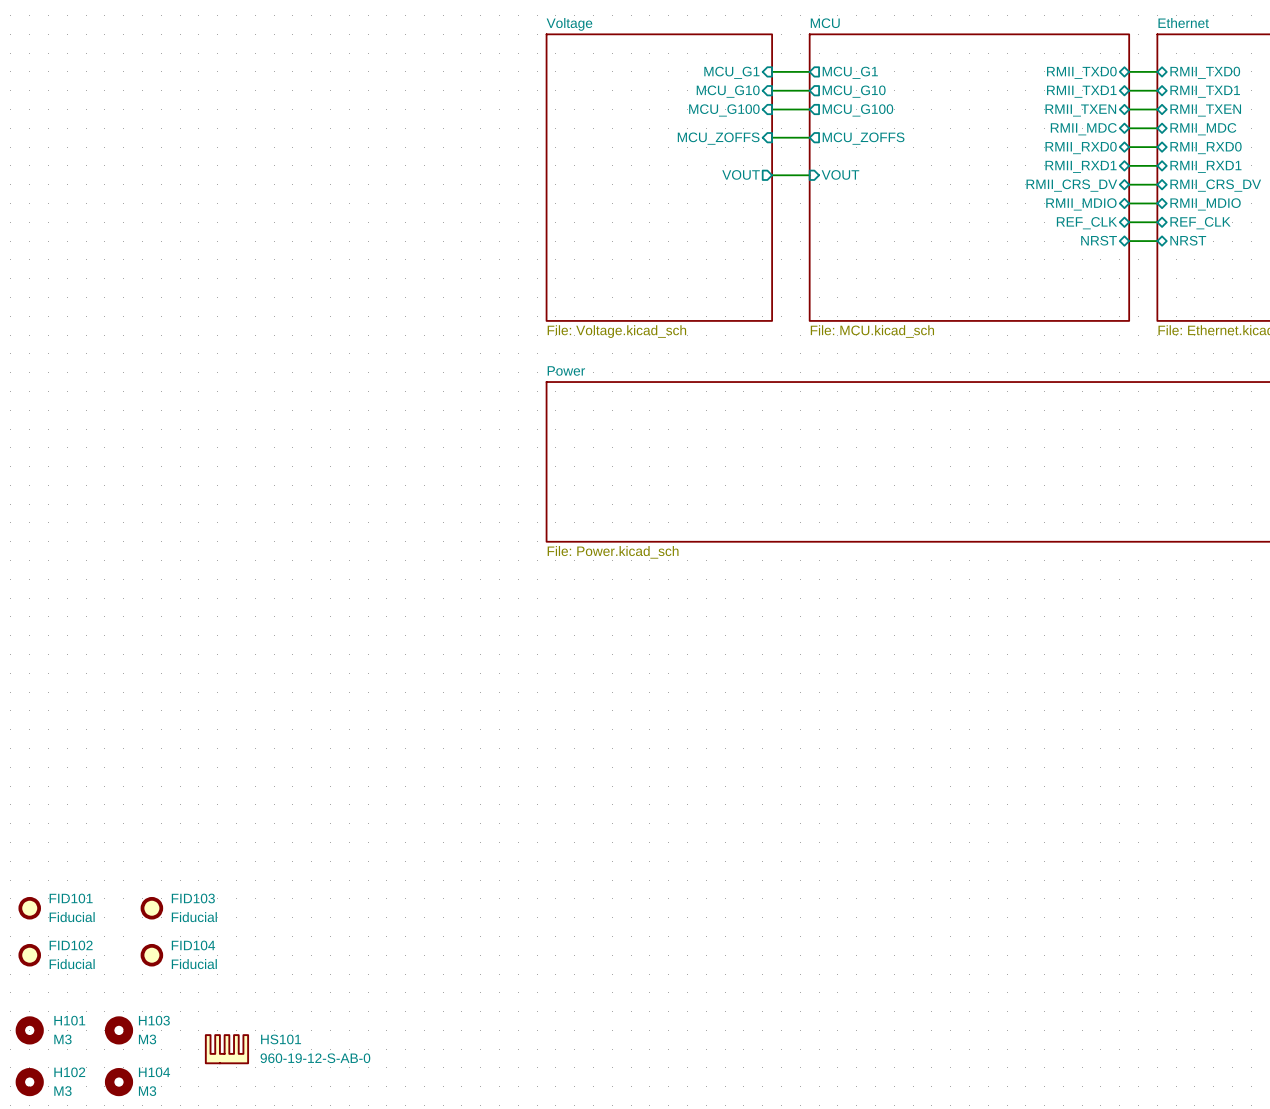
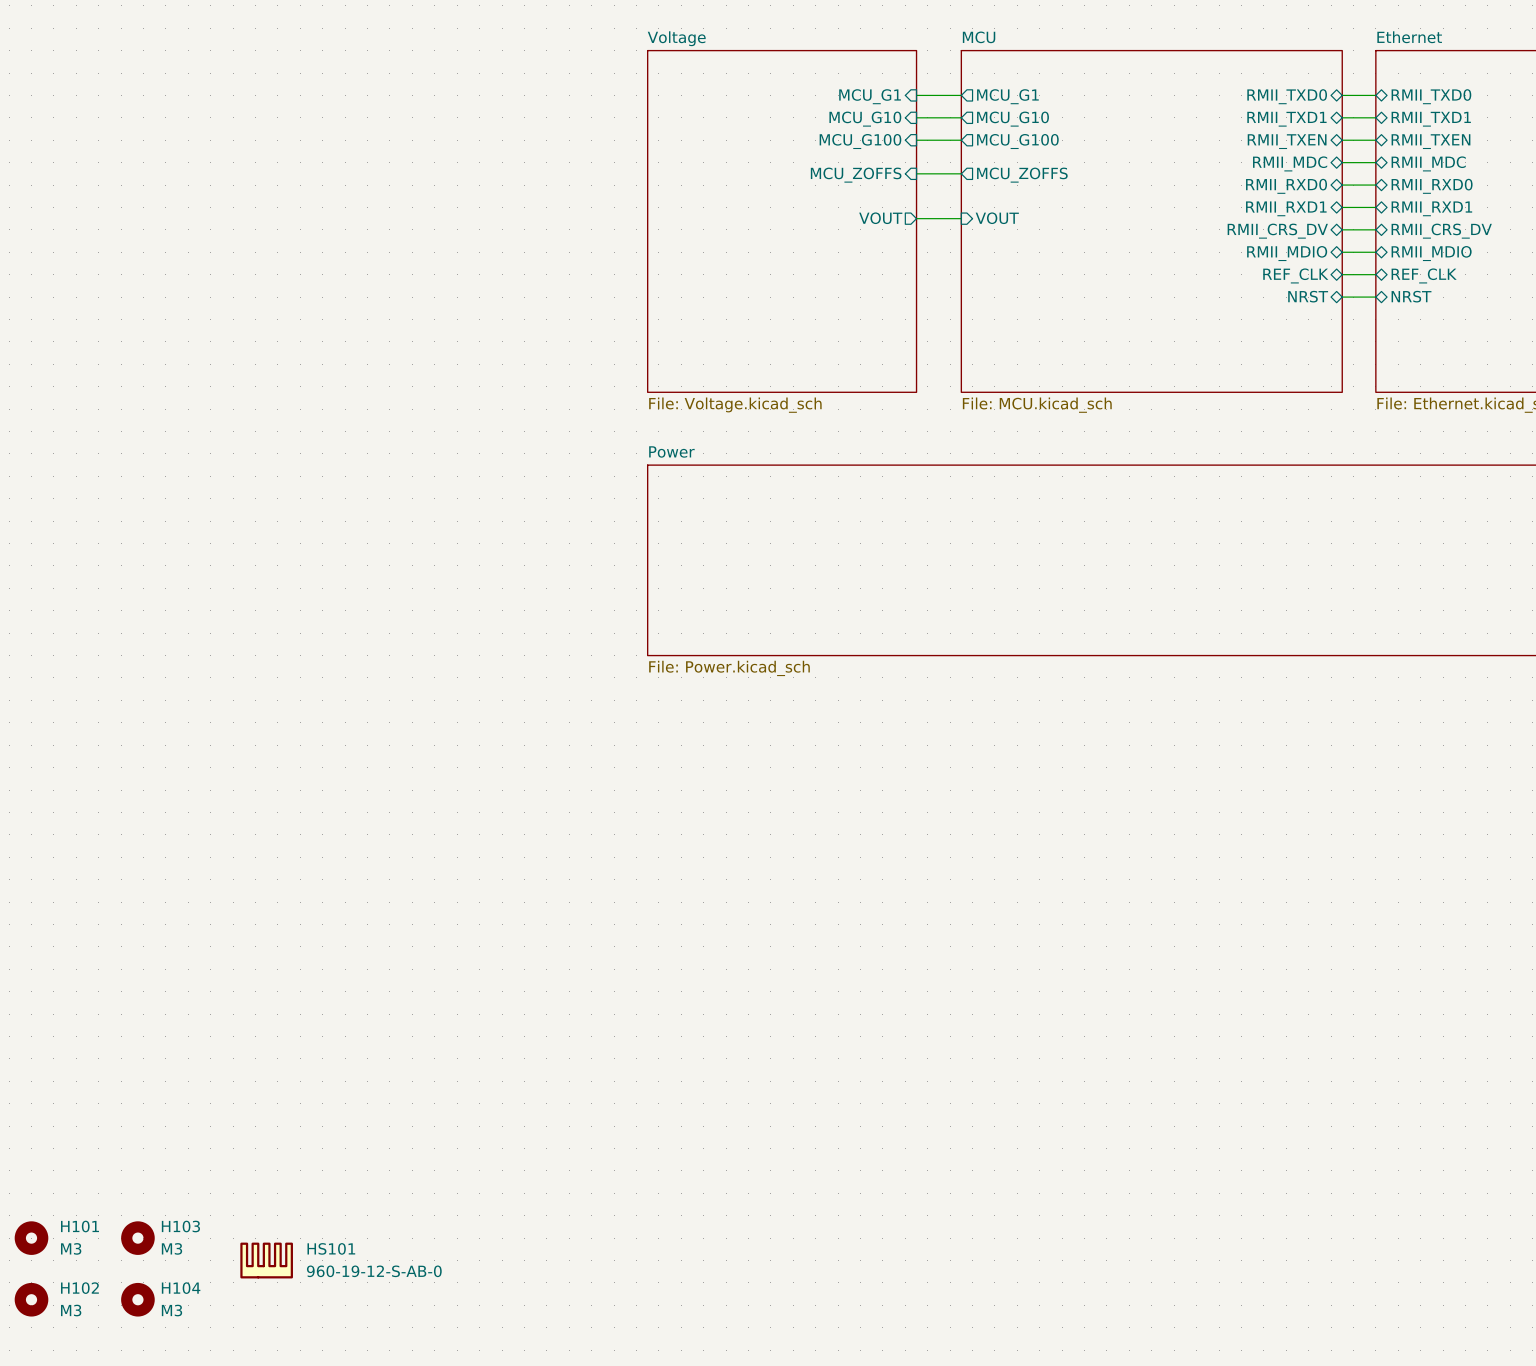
FID101: Fiducial (29, 908) -> none
FID103: Fiducial (151, 908) -> none
FID102: Fiducial (29, 955) -> none
FID104: Fiducial (151, 955) -> none

